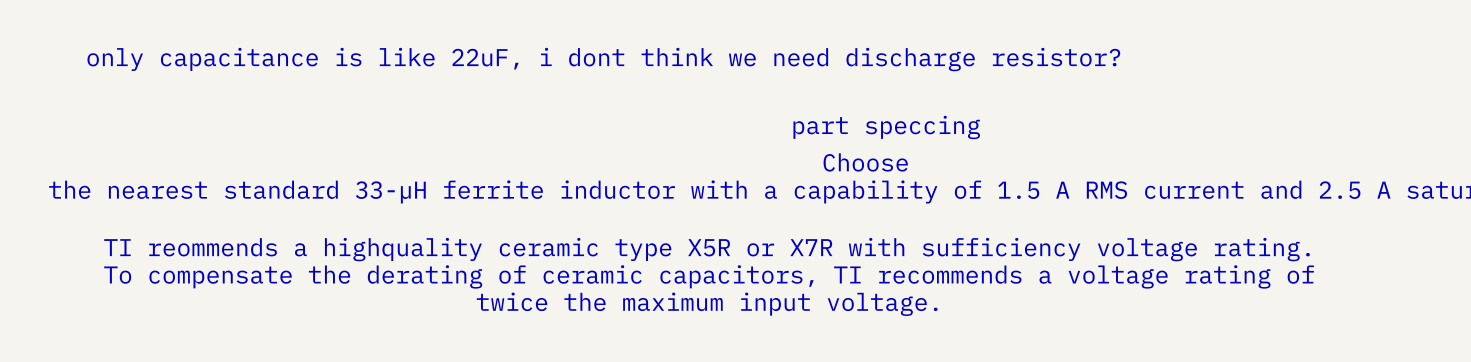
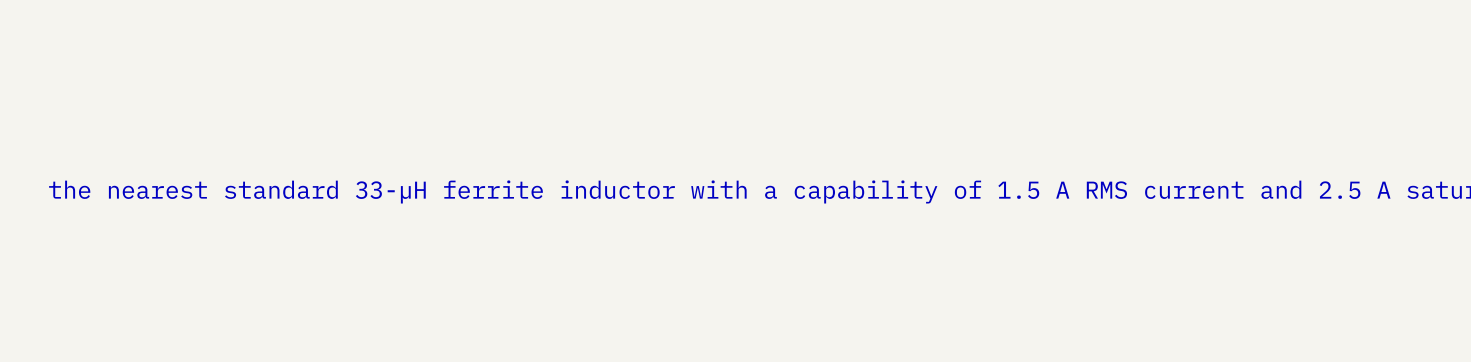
text: only capacitance is like 22uF, i dont think we need discharge resistor? (603, 59) -> none
text: part speccing (886, 127) -> none
text: Choose (865, 162) -> none
text: TI reommends a highquality ceramic type X5R or X7R with sufficiency voltage rating. (706, 249) -> none
text: To compensate the derating of ceramic capacitors, TI recommends a voltage rating of (709, 276) -> none
text: twice the maximum input voltage. (707, 304) -> none

